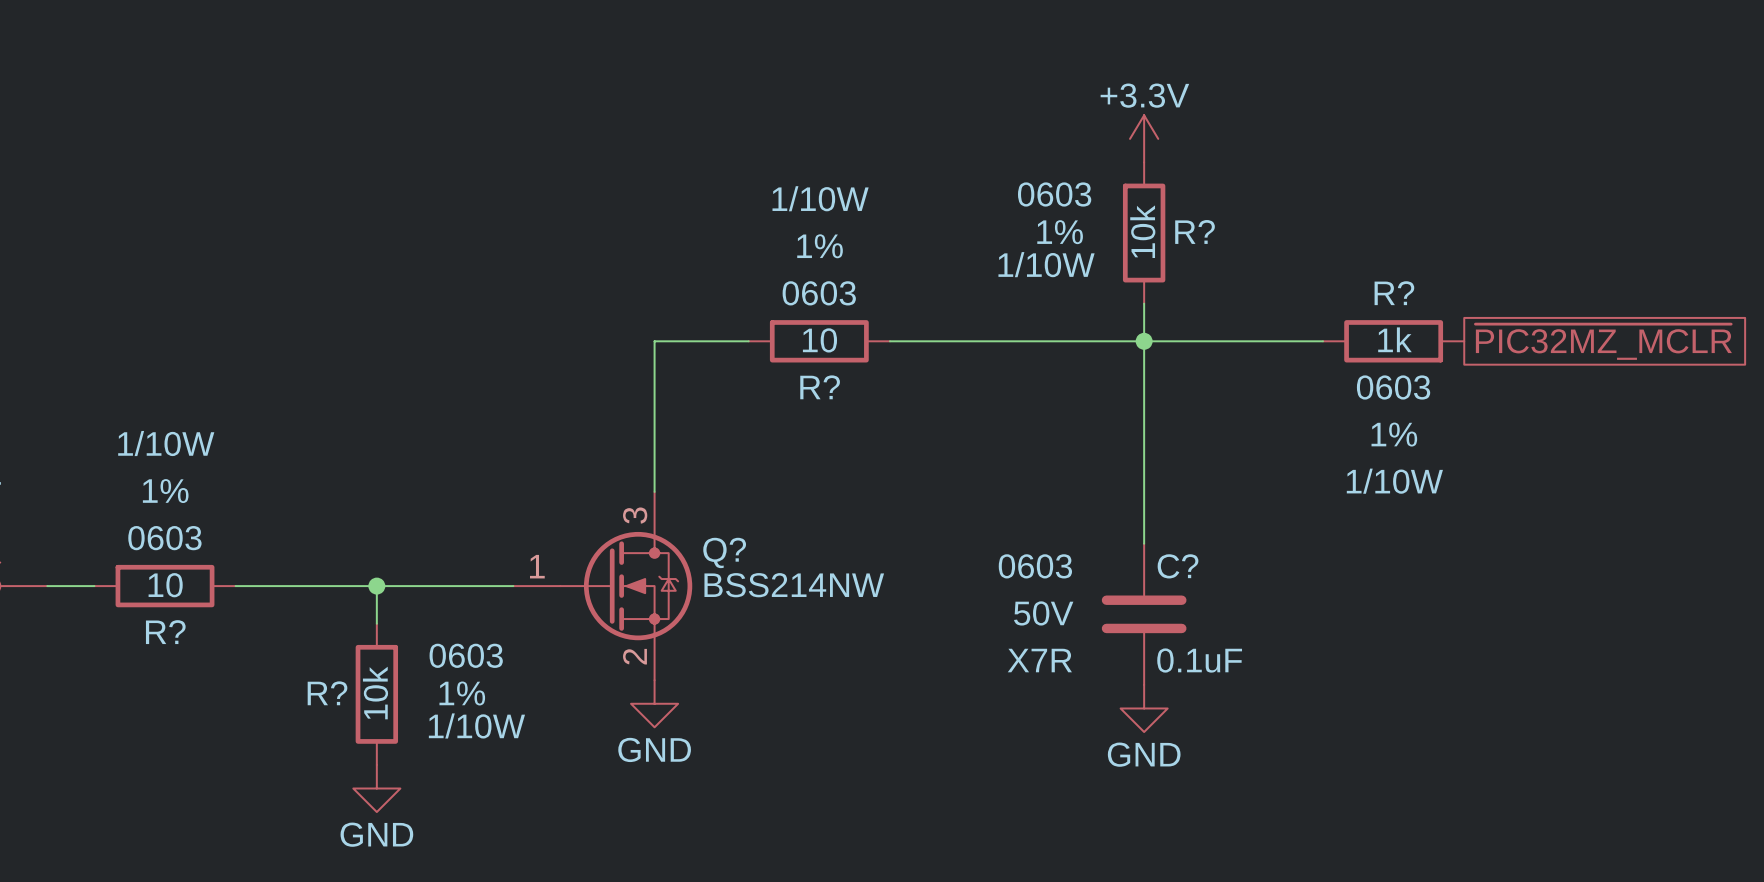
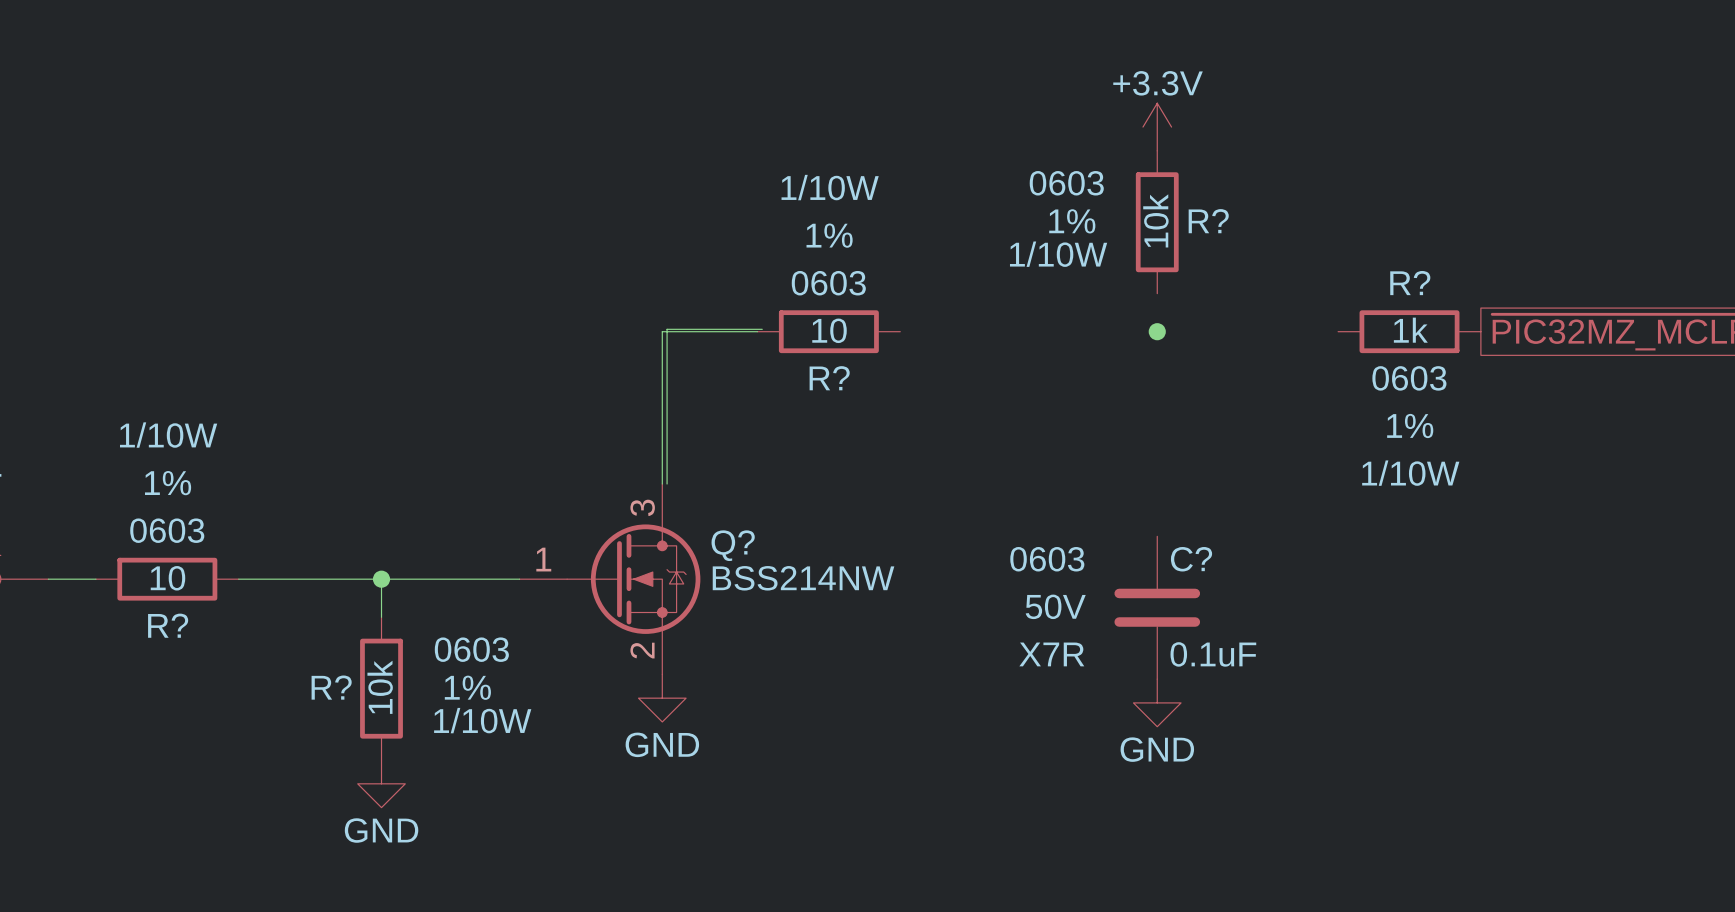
wire: (1144, 303) (1144, 543) -> none
wire: none -> (762, 329) (667, 329) (667, 484)
wire: (889, 341) (1323, 341) -> none

